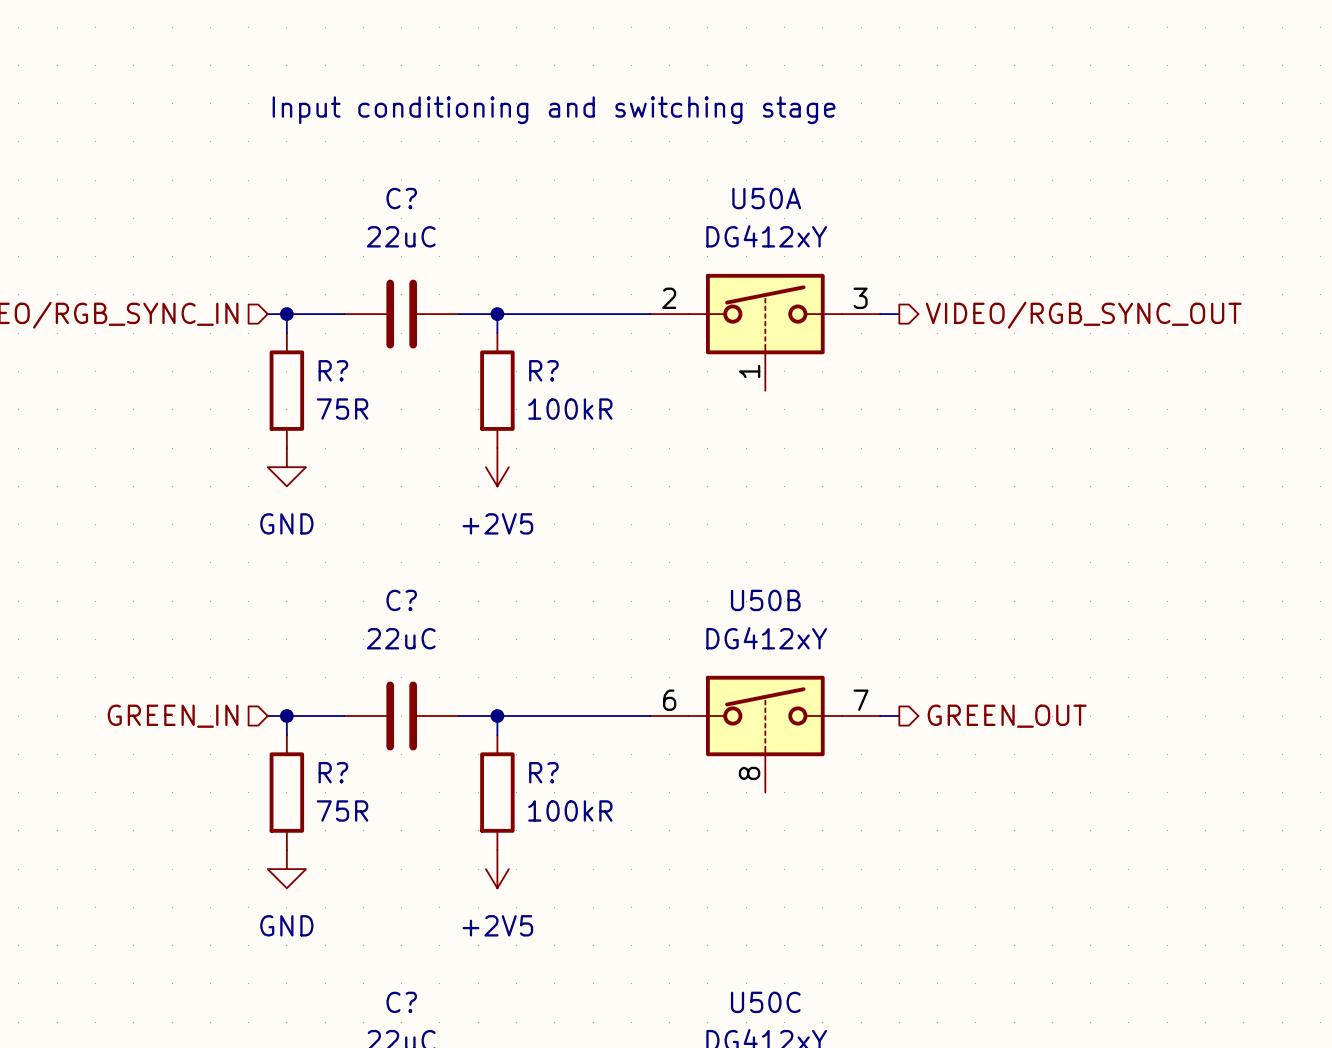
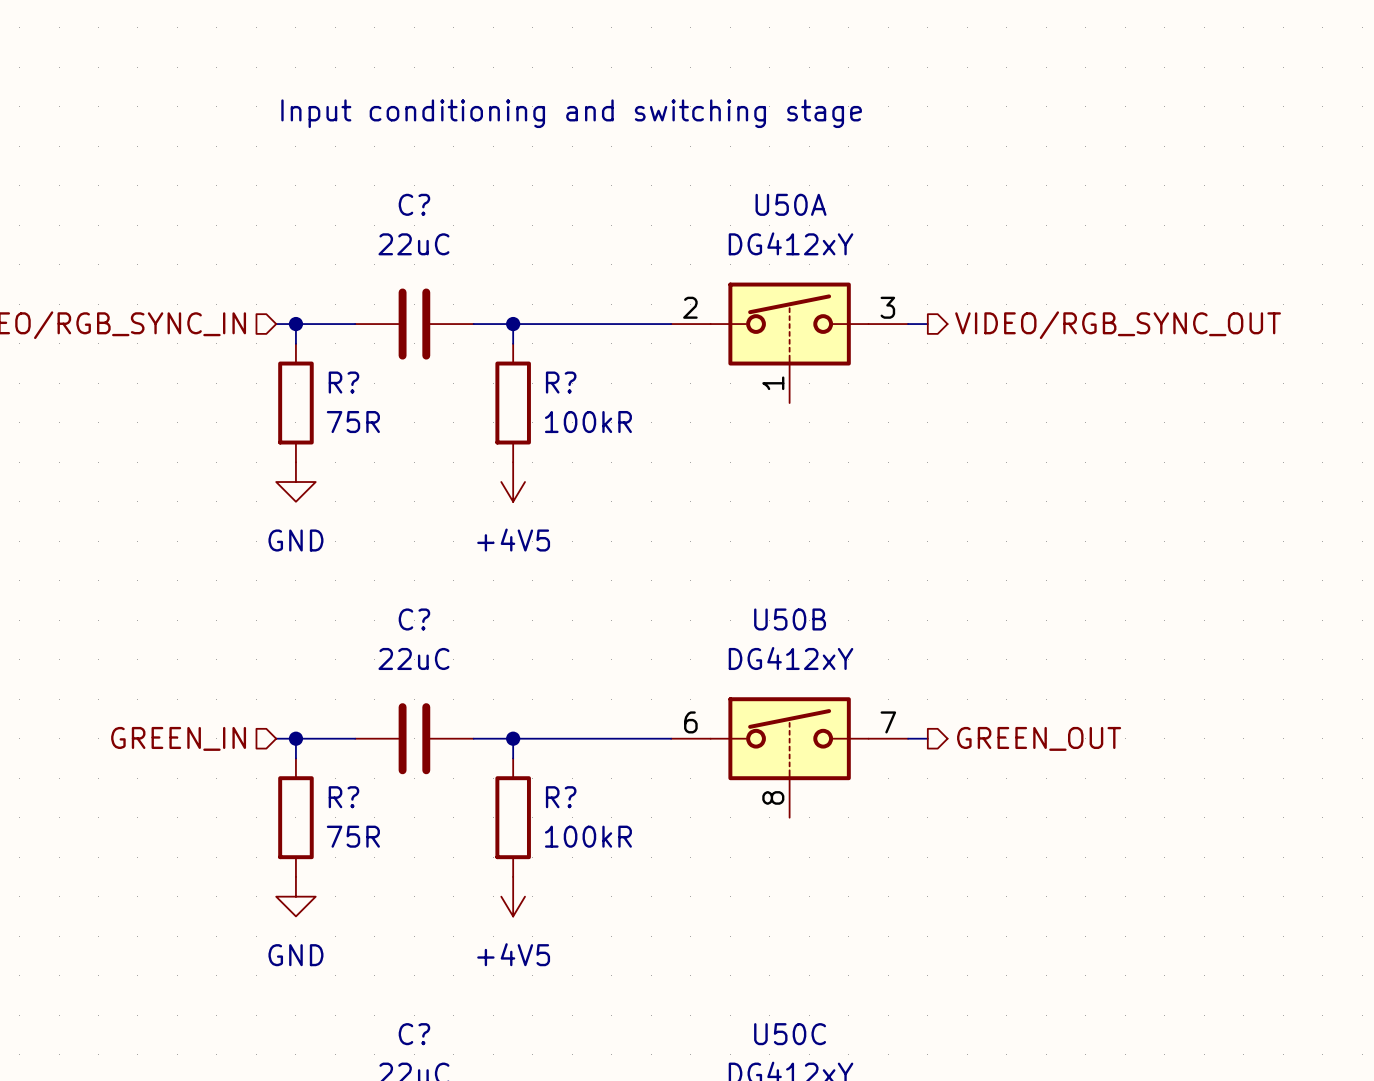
power symbol: +2V5 (497, 467) -> +4V5 (513, 482)
power symbol: +2V5 (497, 869) -> +4V5 (513, 896)

